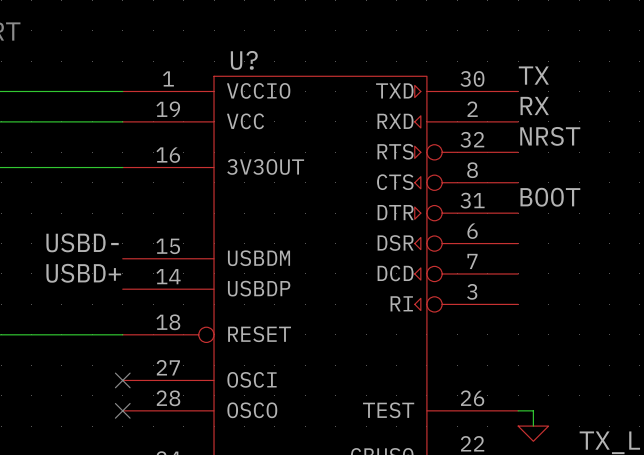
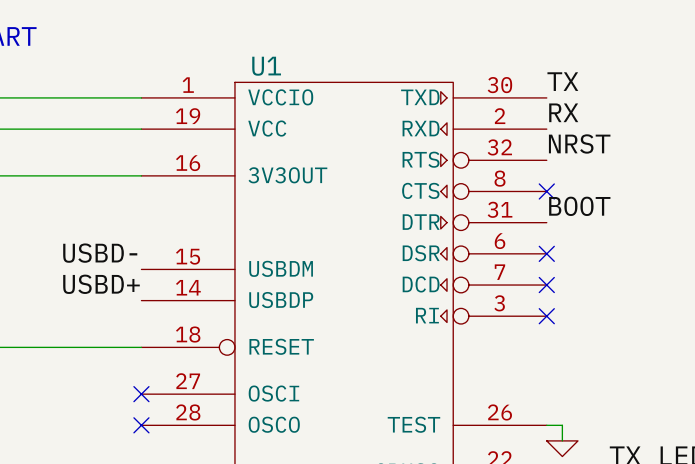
U? name: U? (244, 60) -> U1 (266, 66)
no-connect mark: none -> (546, 191)
no-connect mark: none -> (546, 253)
no-connect mark: none -> (546, 285)
no-connect mark: none -> (546, 316)

